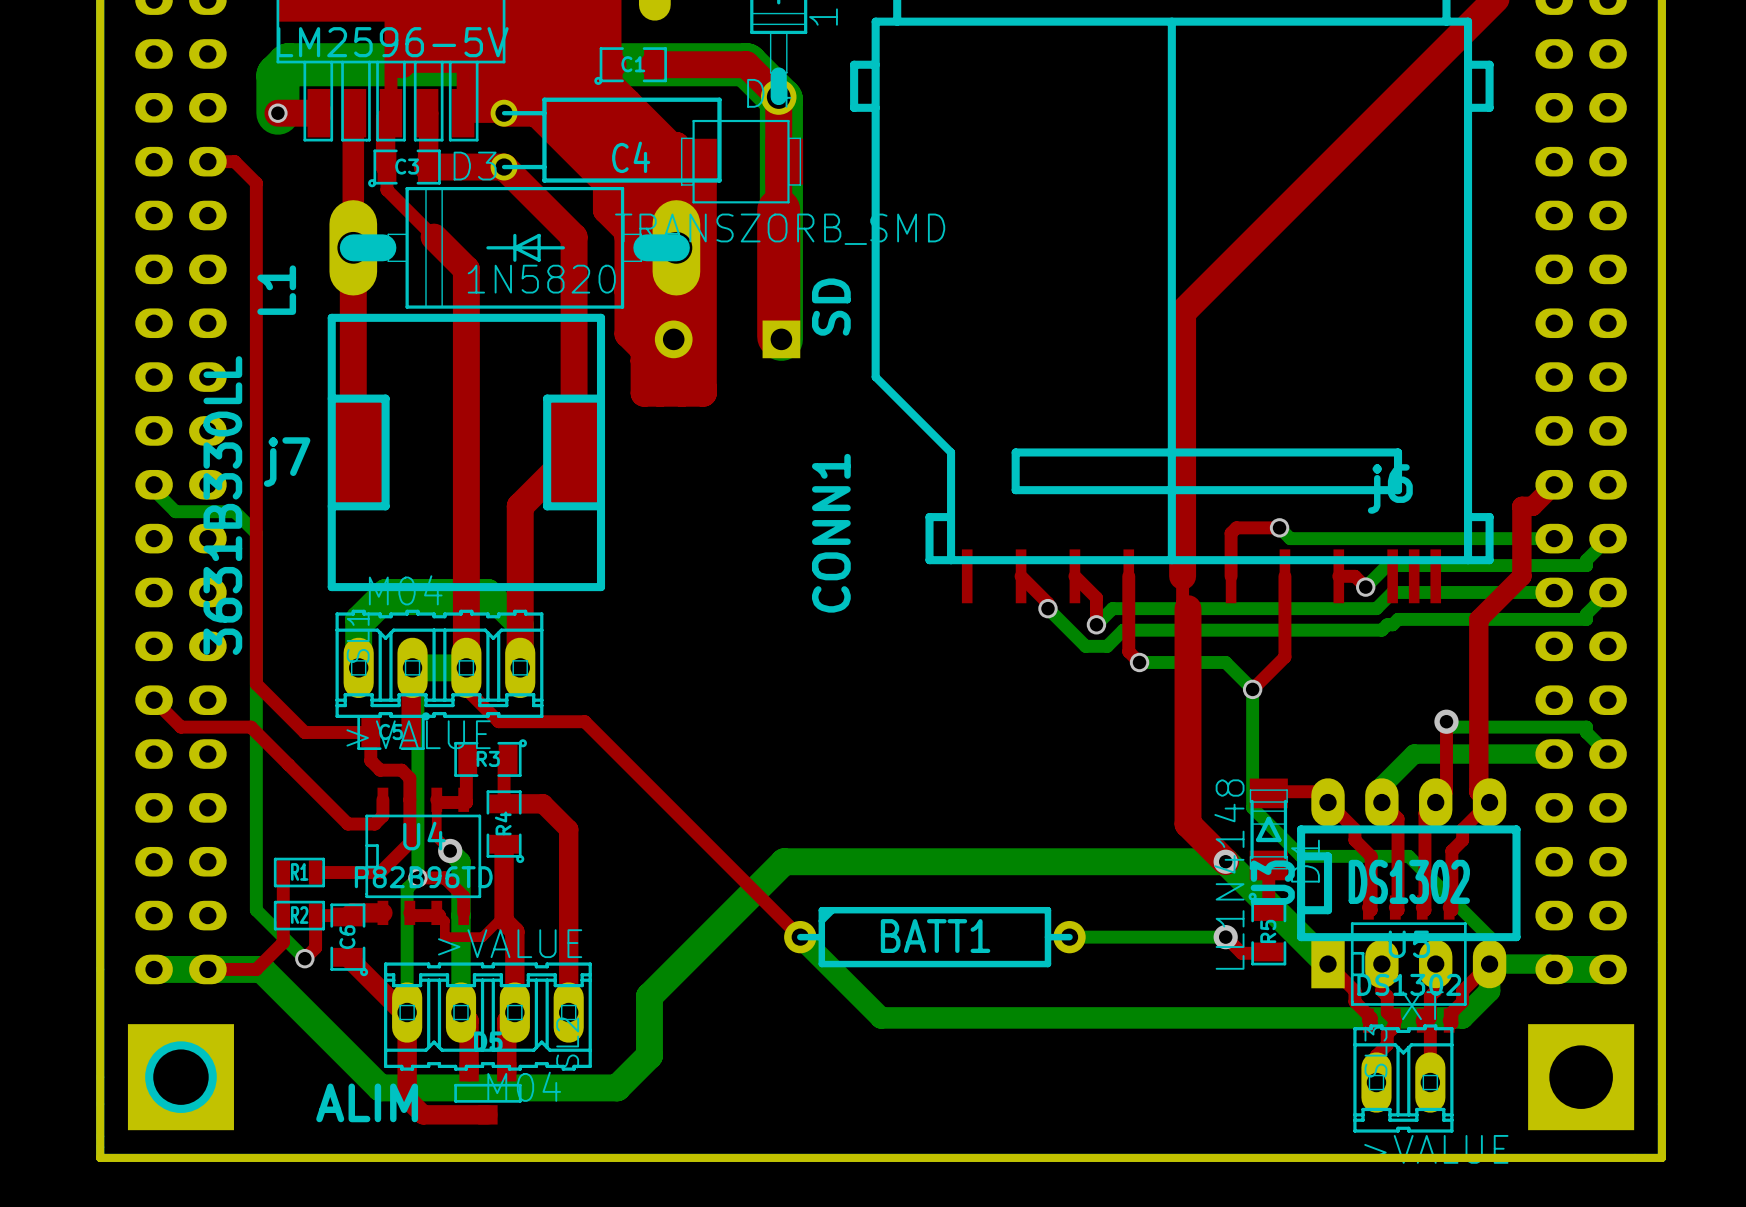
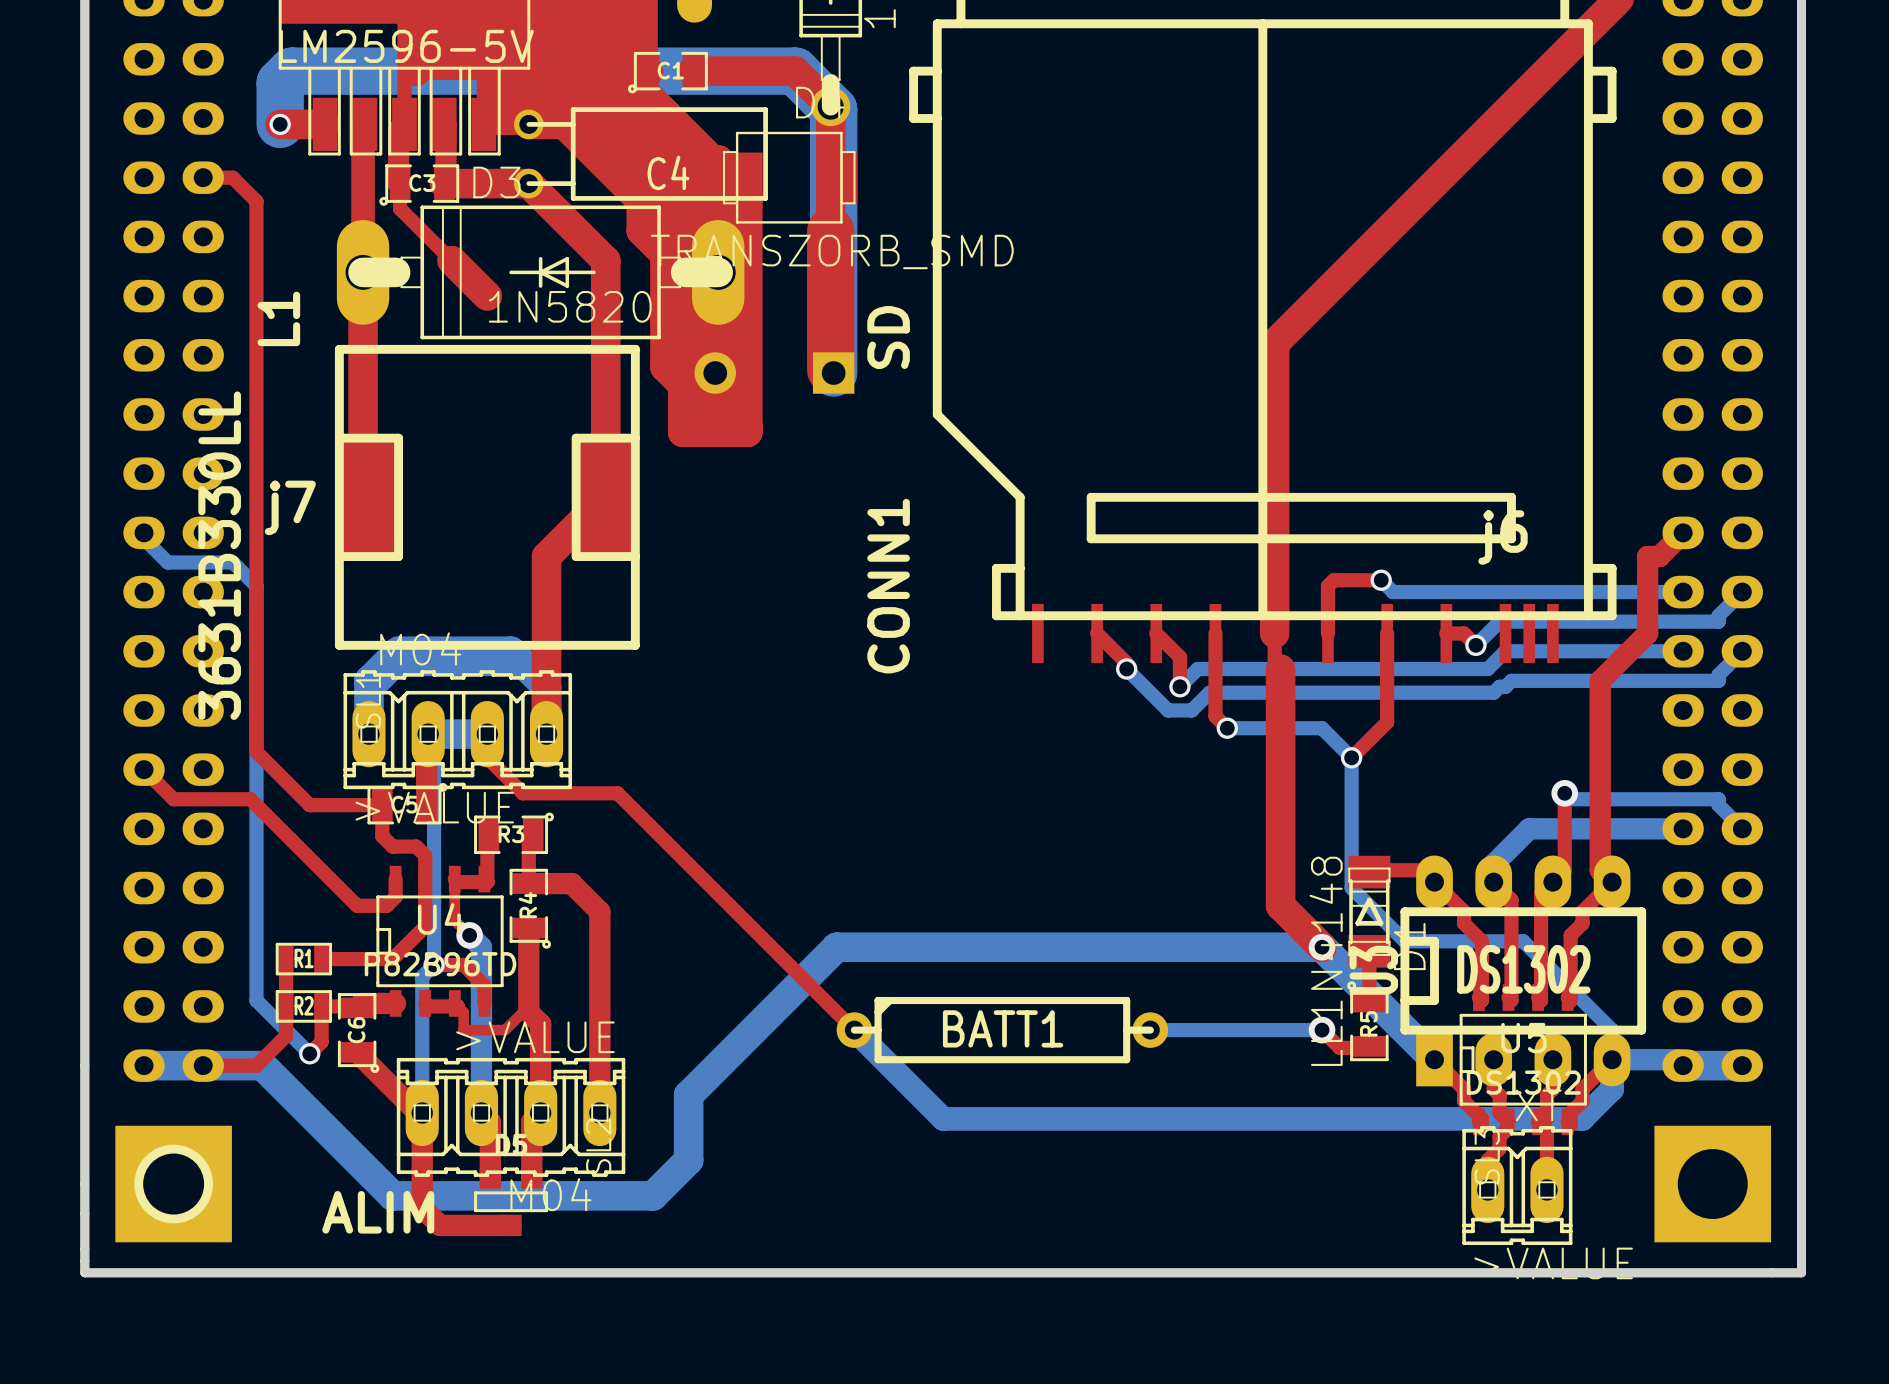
top track: (466, 269) (466, 667) -> none

